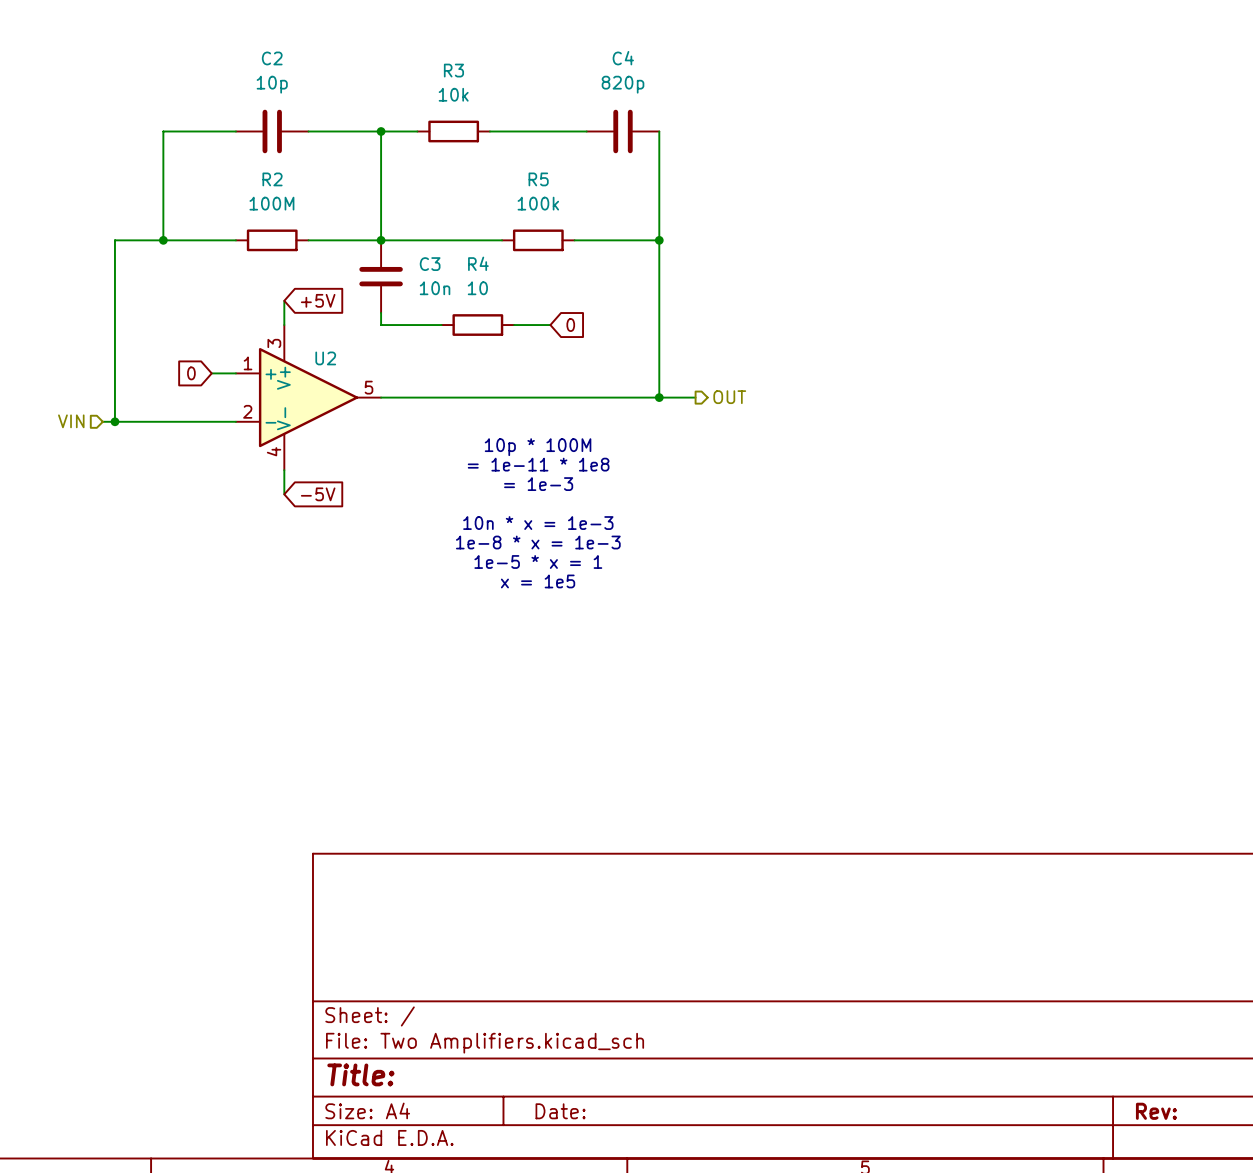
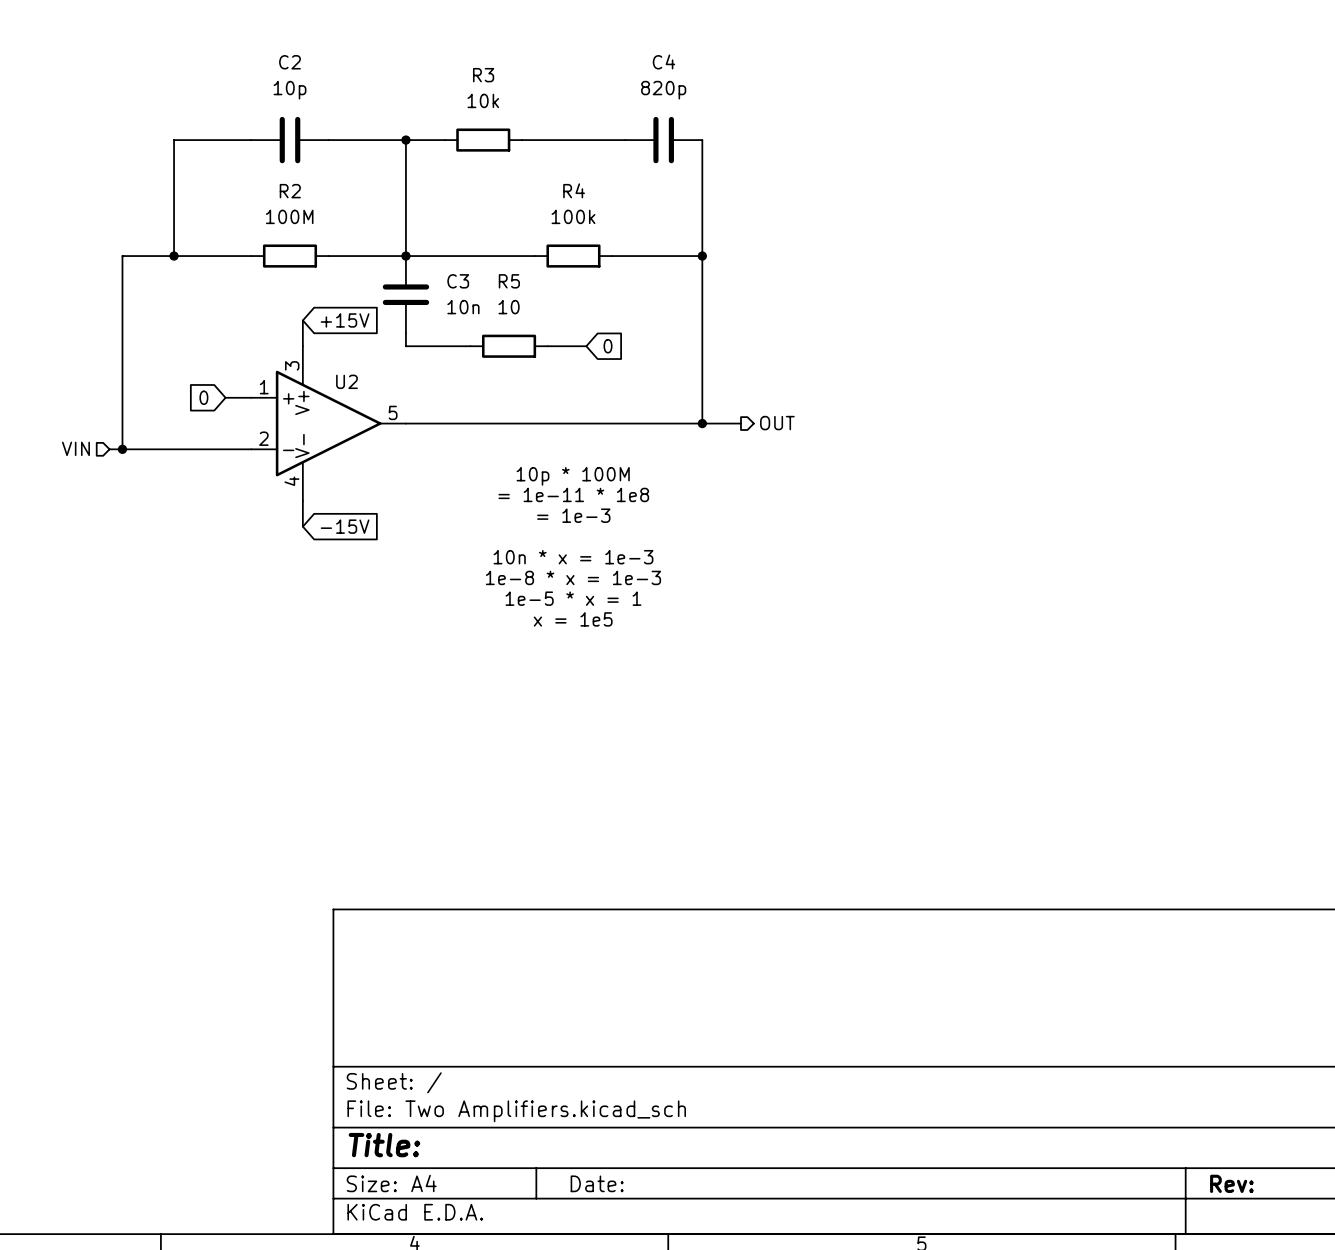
R5 name: R5 (538, 179) -> R4 (574, 190)
R4 name: R4 (478, 263) -> R5 (509, 281)
global label: +5V (318, 300) -> +15V (345, 320)
global label: -5V (318, 494) -> -15V (345, 526)

